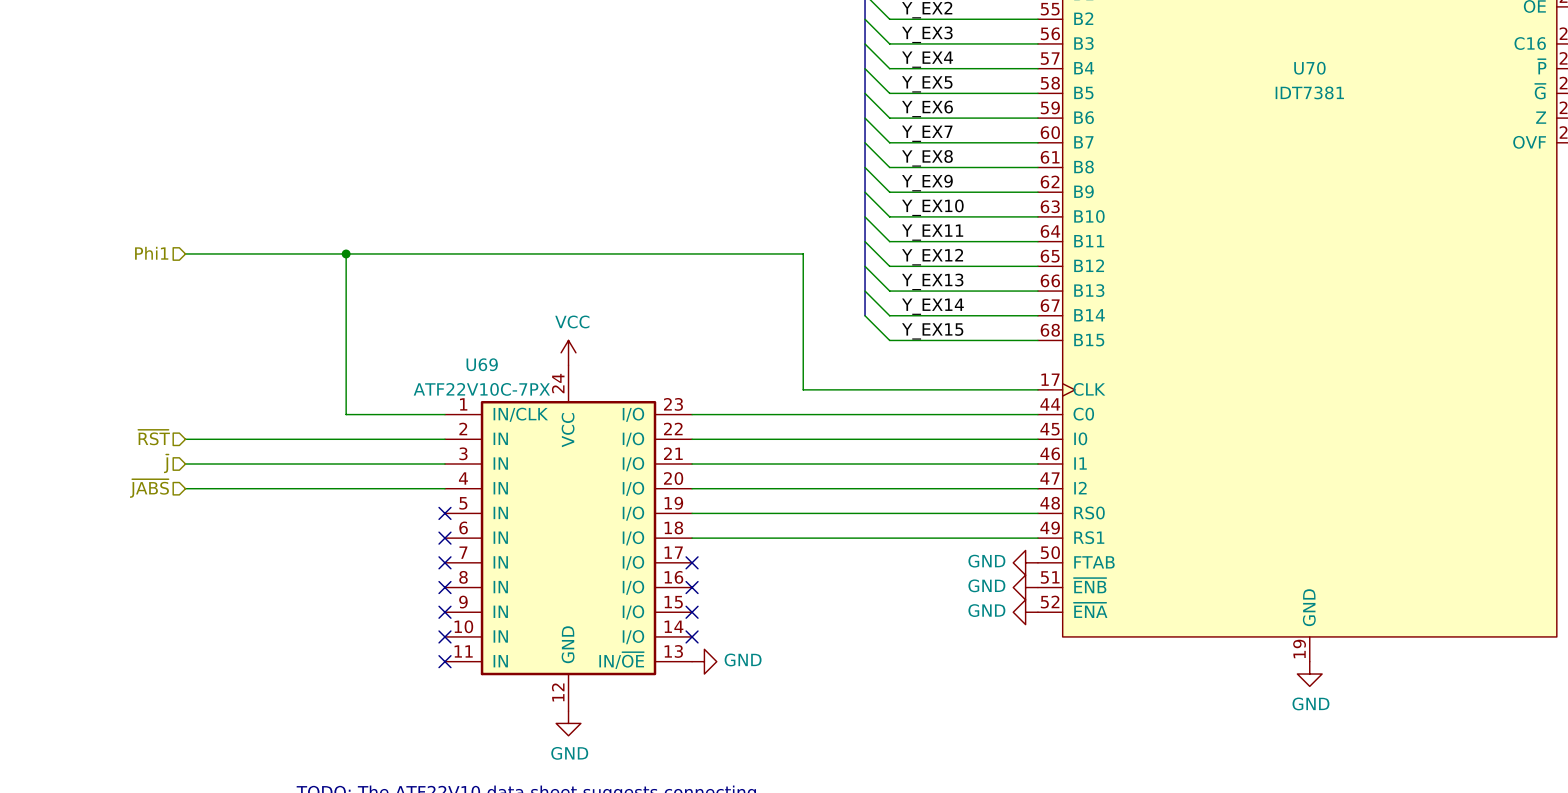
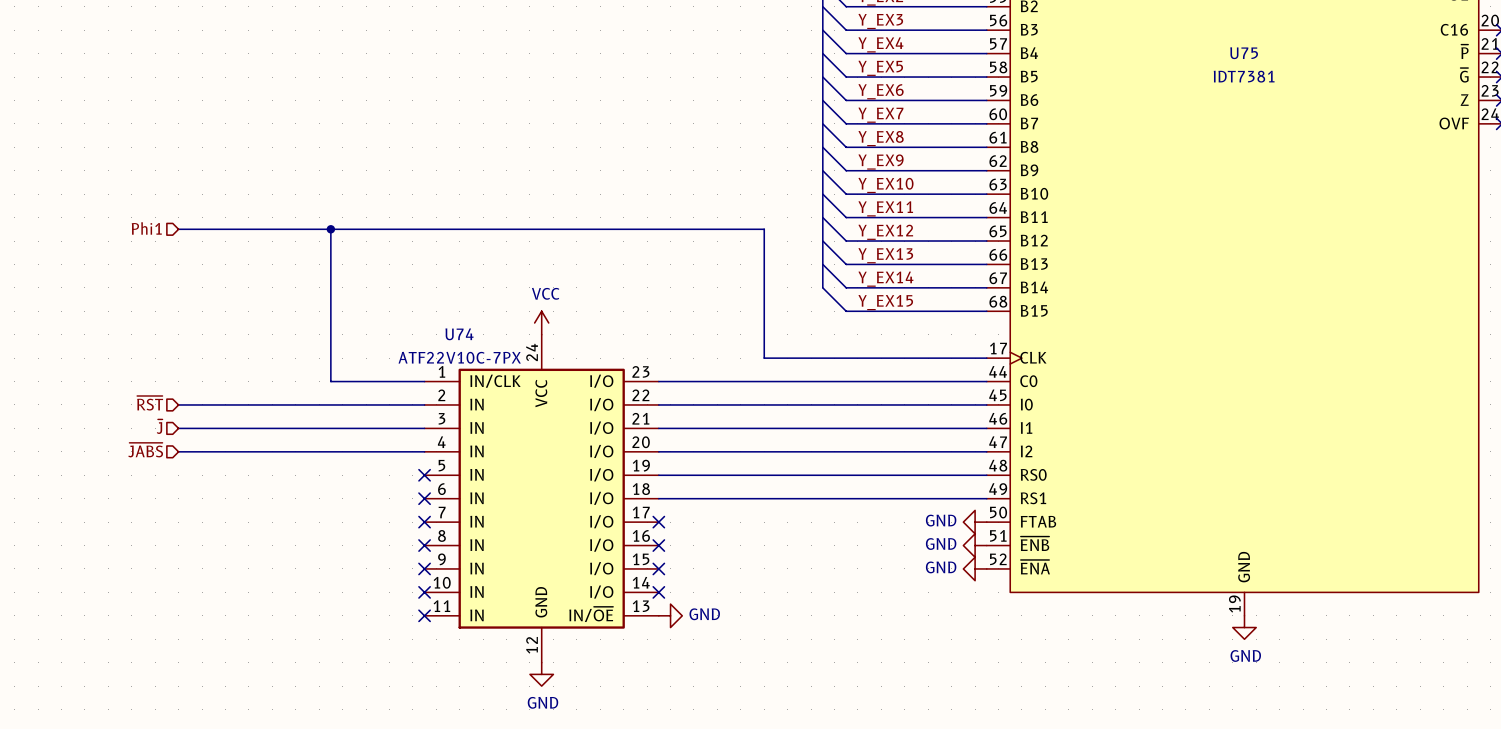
U70 name: U70 (1309, 68) -> U75 (1244, 53)
U69 name: U69 (482, 364) -> U74 (459, 334)

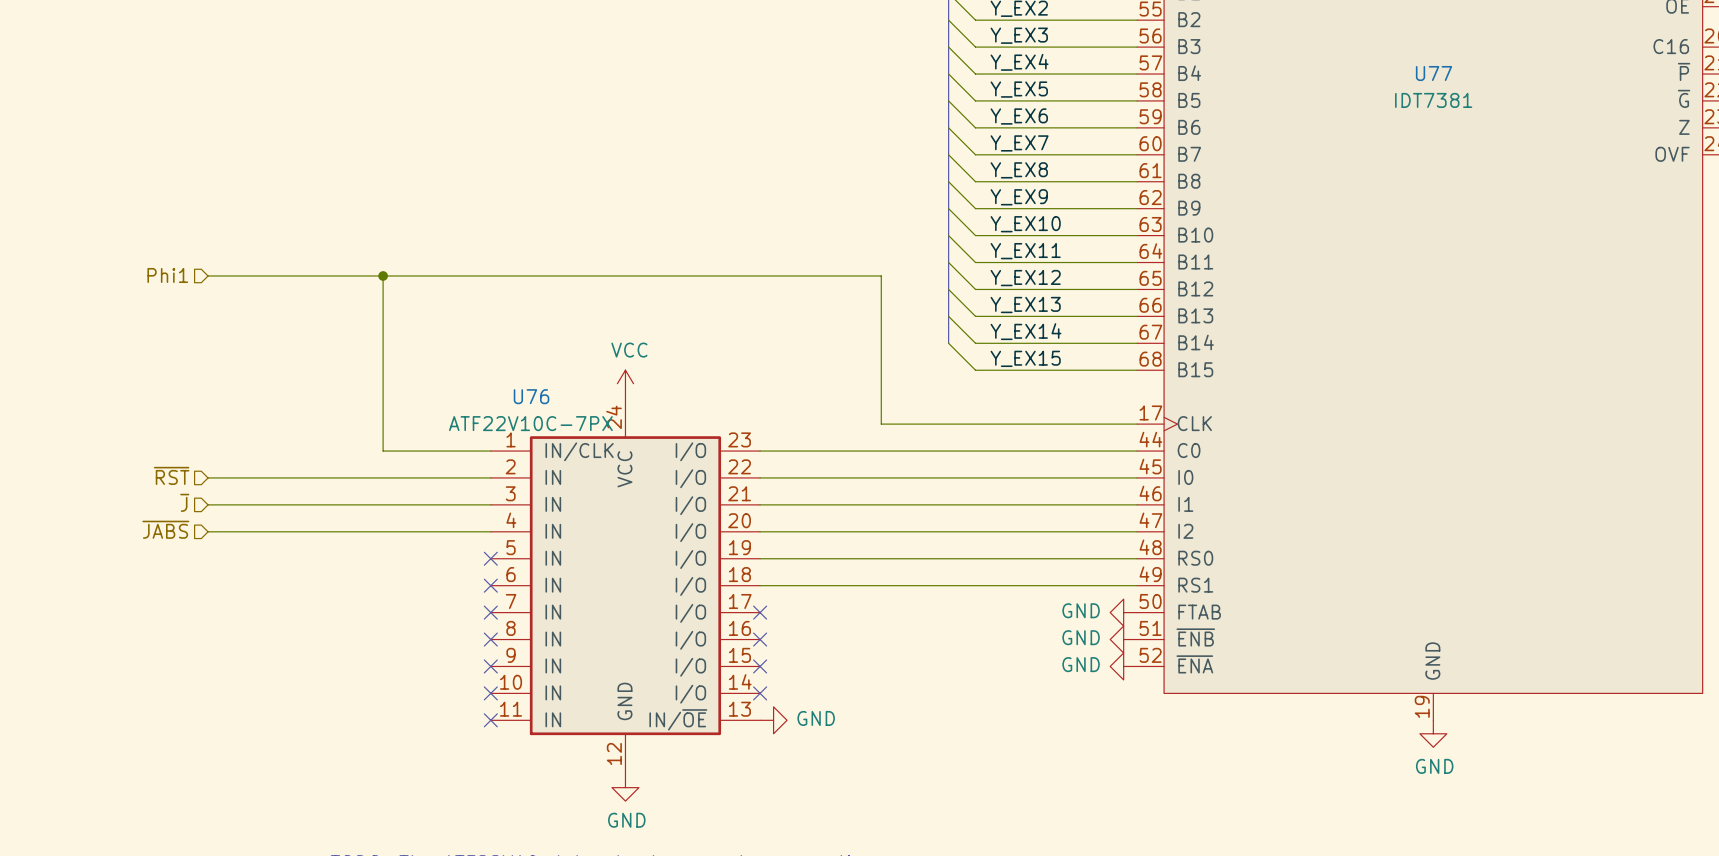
U75 name: U75 (1244, 53) -> U77 (1433, 73)
U74 name: U74 (459, 334) -> U76 (531, 396)

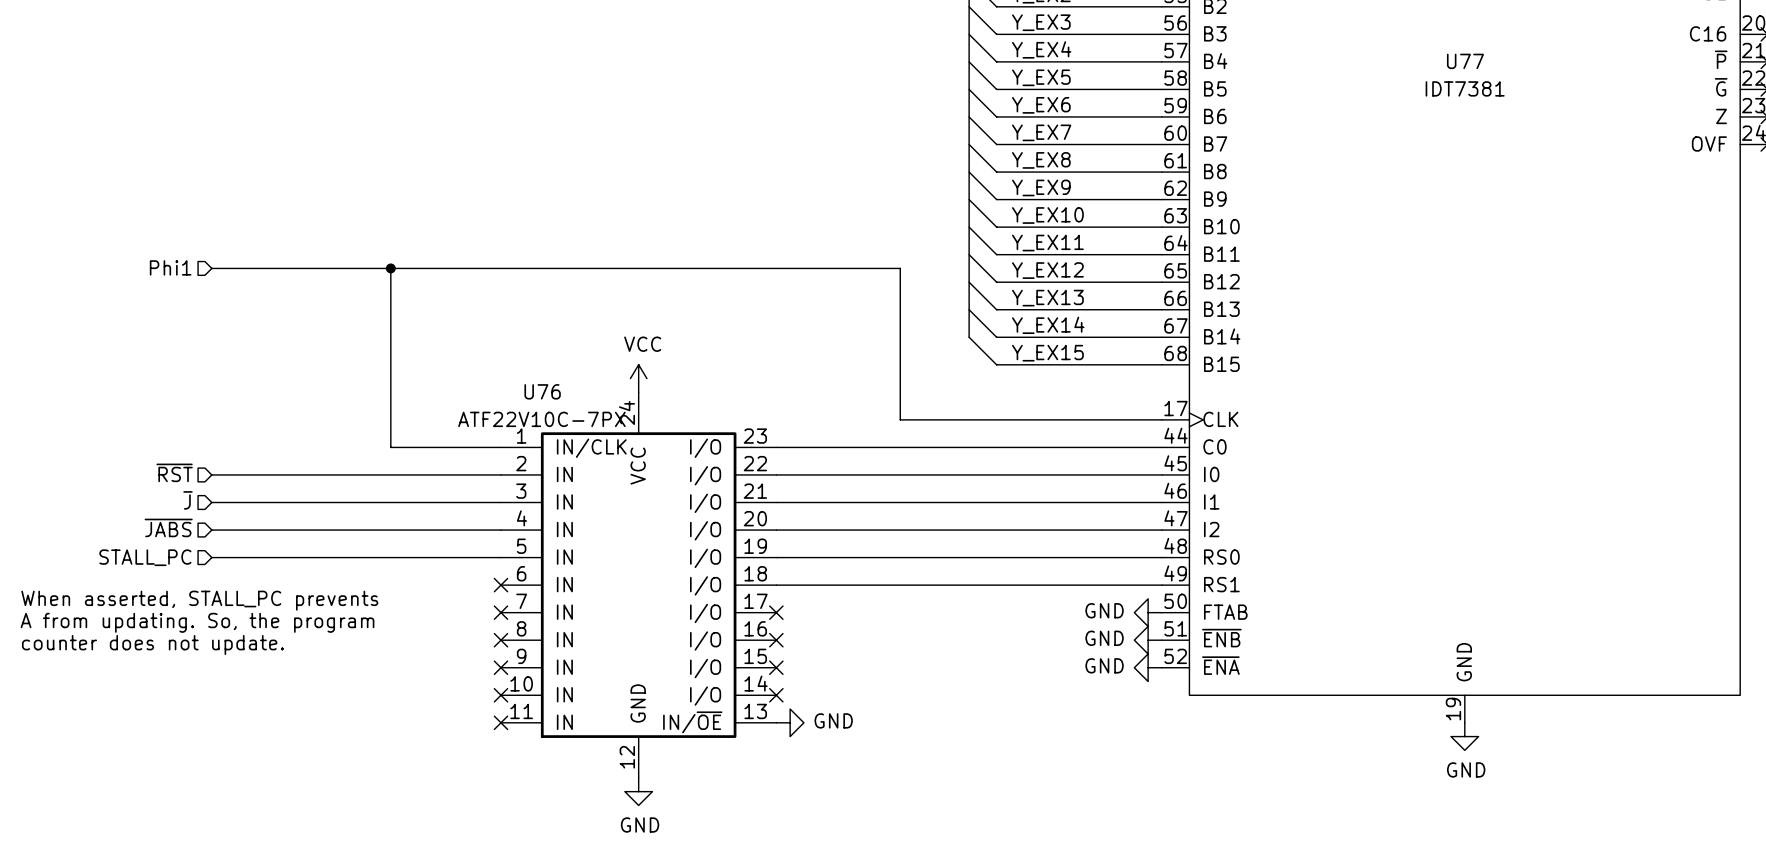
hierarchical label: none -> STALL_PC (145, 557)
wire: none -> (211, 557) (500, 557)
no-connect mark: (490, 558) -> none
text: none -> When asserted, STALL_PC prevents (199, 600)
text: none -> A from updating. So, the program (197, 622)
text: none -> counter does not update. (152, 644)

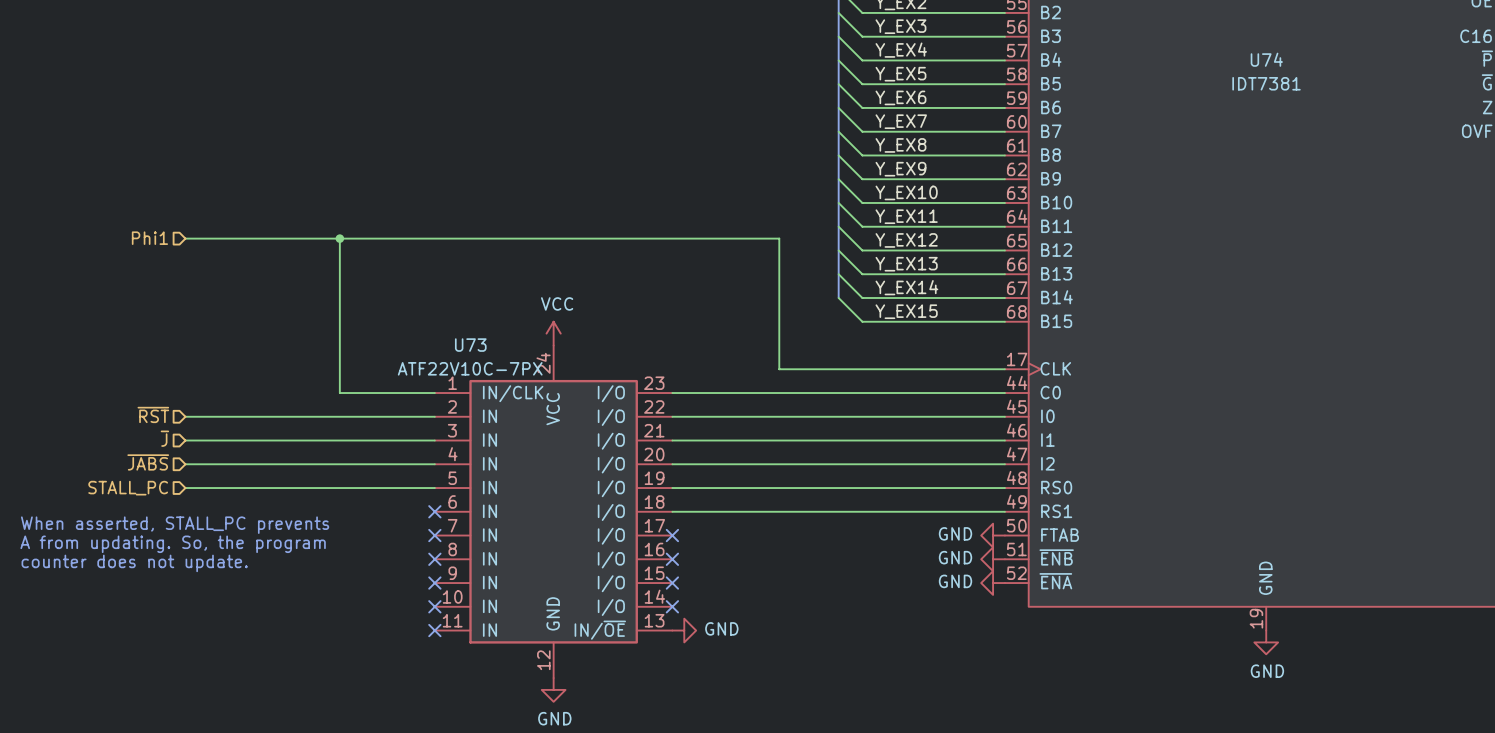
U77 name: U77 (1465, 61) -> U74 (1266, 59)
U76 name: U76 (542, 391) -> U73 (470, 345)

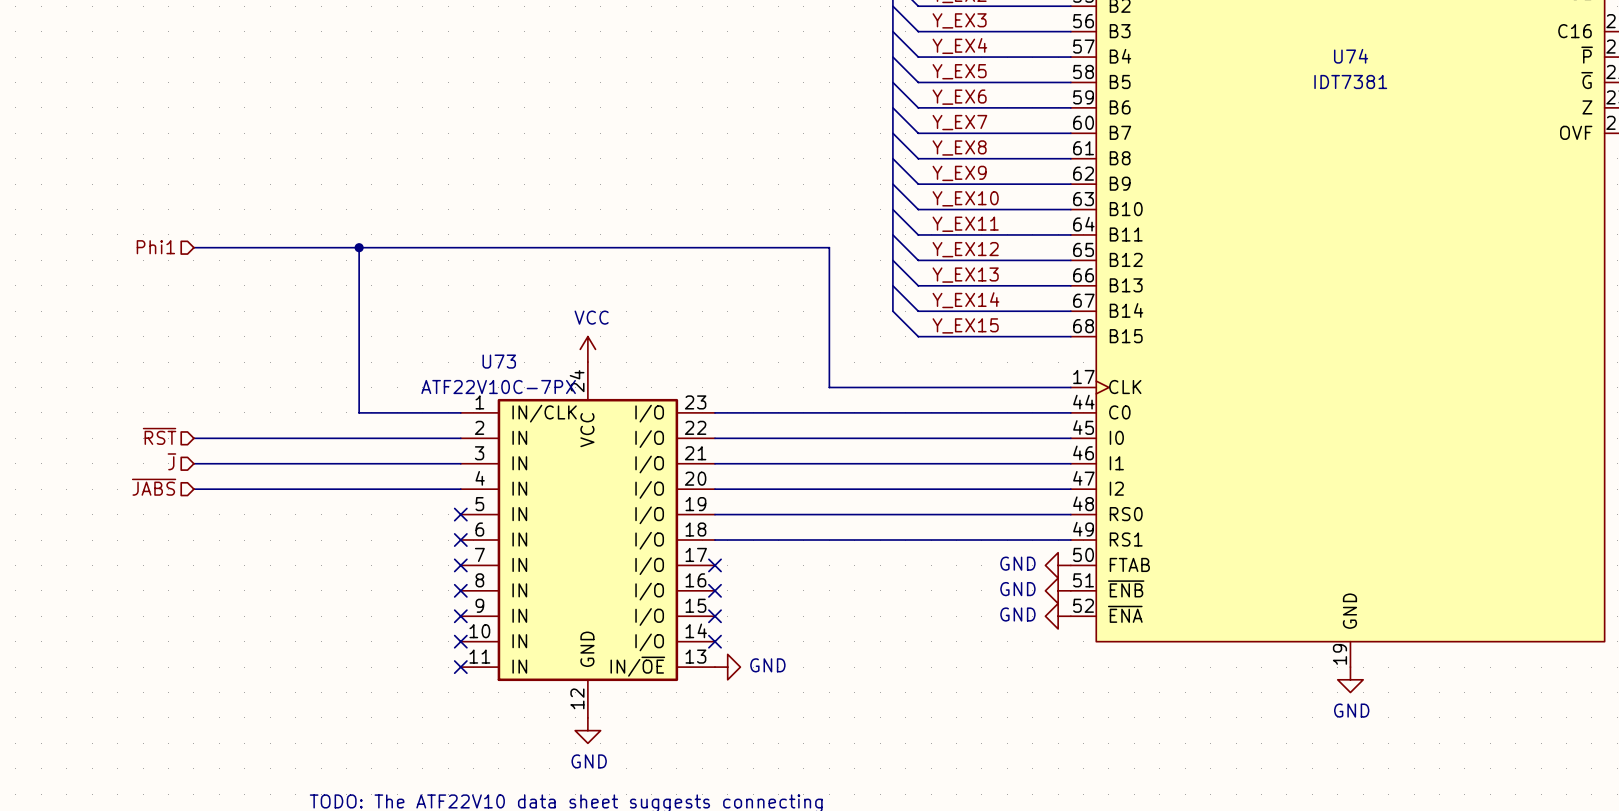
hierarchical label: STALL_PC (128, 488) -> none
wire: (185, 488) (434, 488) -> none
no-connect mark: none -> (460, 514)
text: When asserted, STALL_PC prevents (175, 525) -> none
text: A from updating. So, the program (173, 544) -> none
text: counter does not update. (134, 563) -> none

